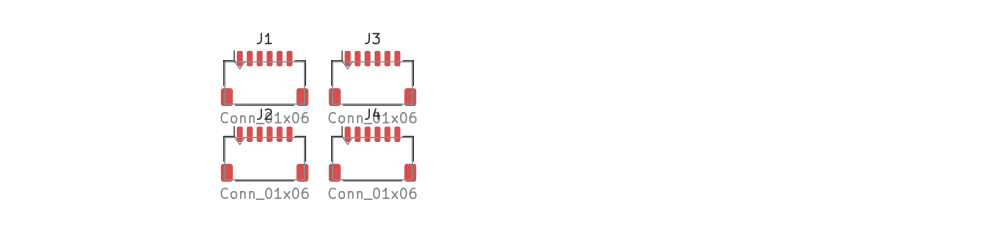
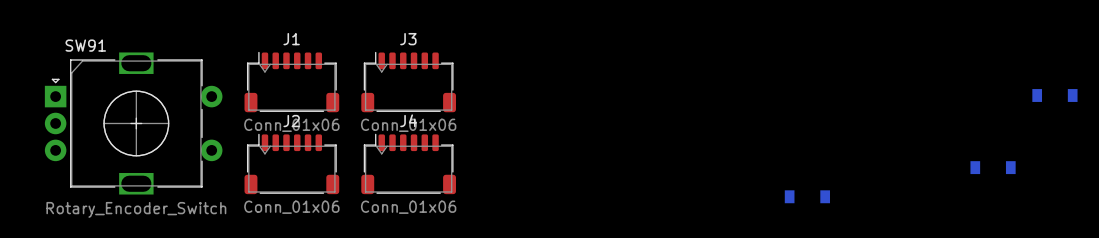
part: none -> (1054, 95)
SW91: none -> Rotary_Encoder_Switch (133, 123)
part: none -> (993, 167)
part: none -> (807, 196)

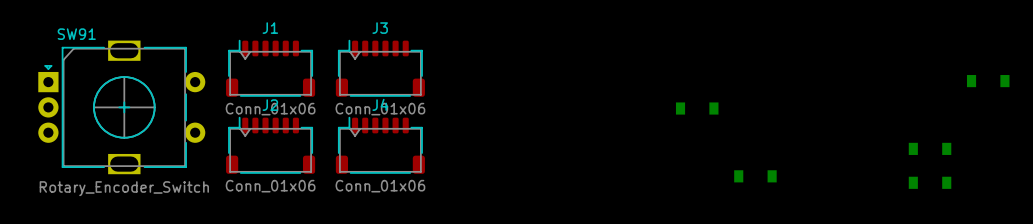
part: none -> (697, 108)
part: none -> (930, 182)

